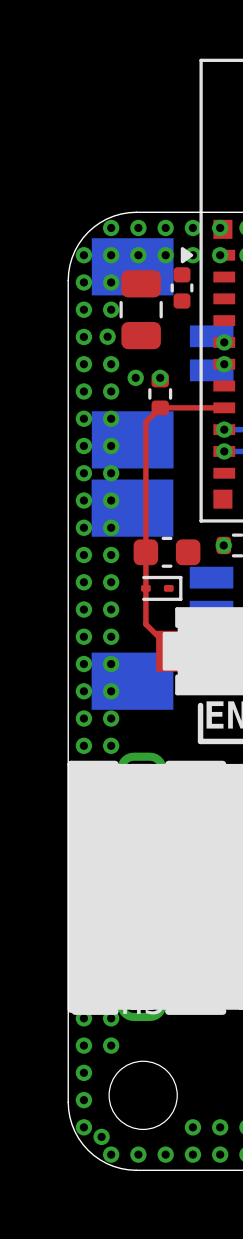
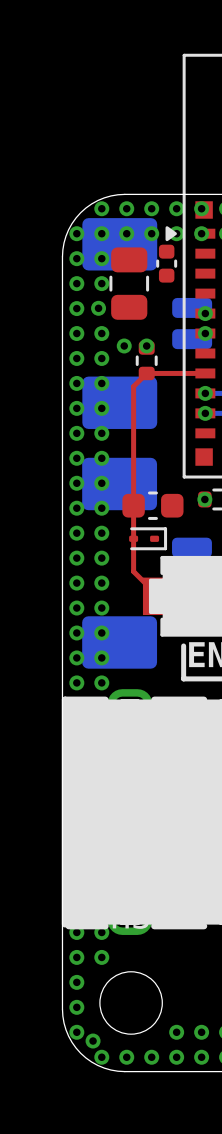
part footprint: [91, 238, 234, 469] -> [82, 218, 213, 429]
part footprint: [91, 479, 234, 710] -> [82, 457, 212, 669]

